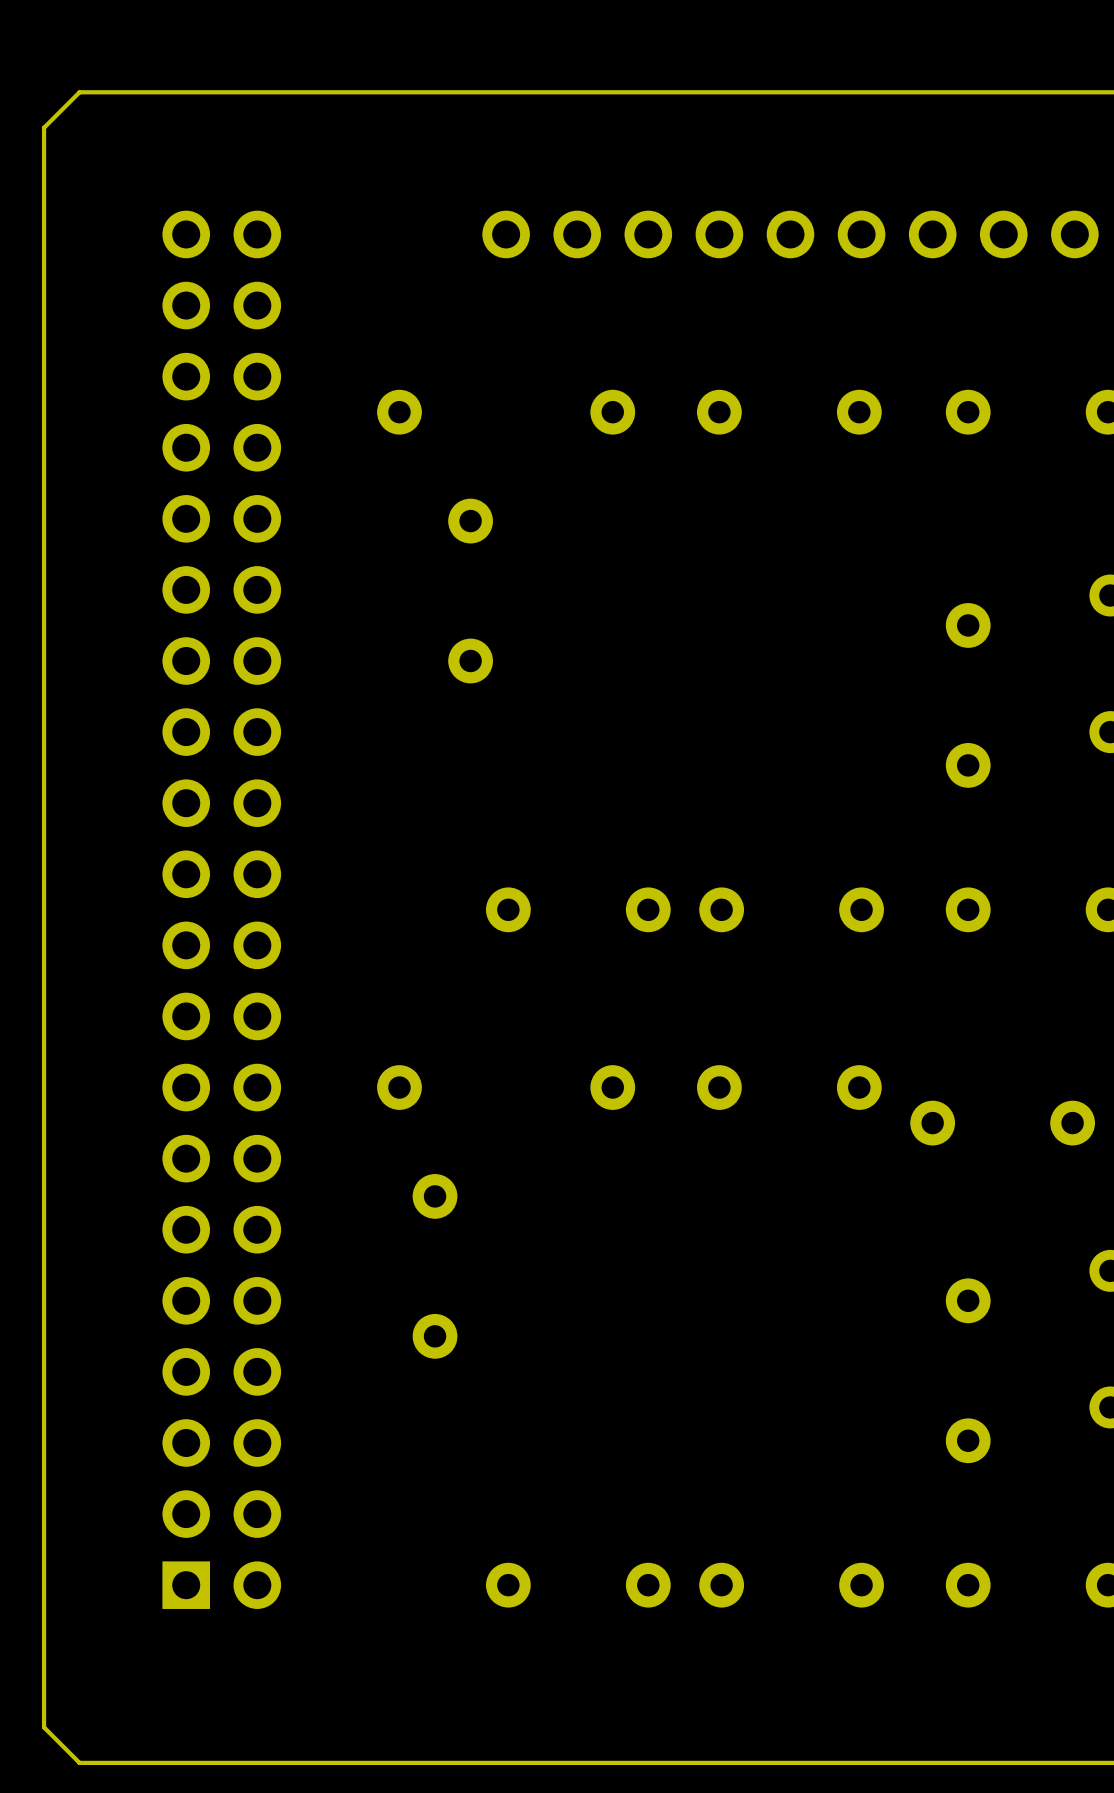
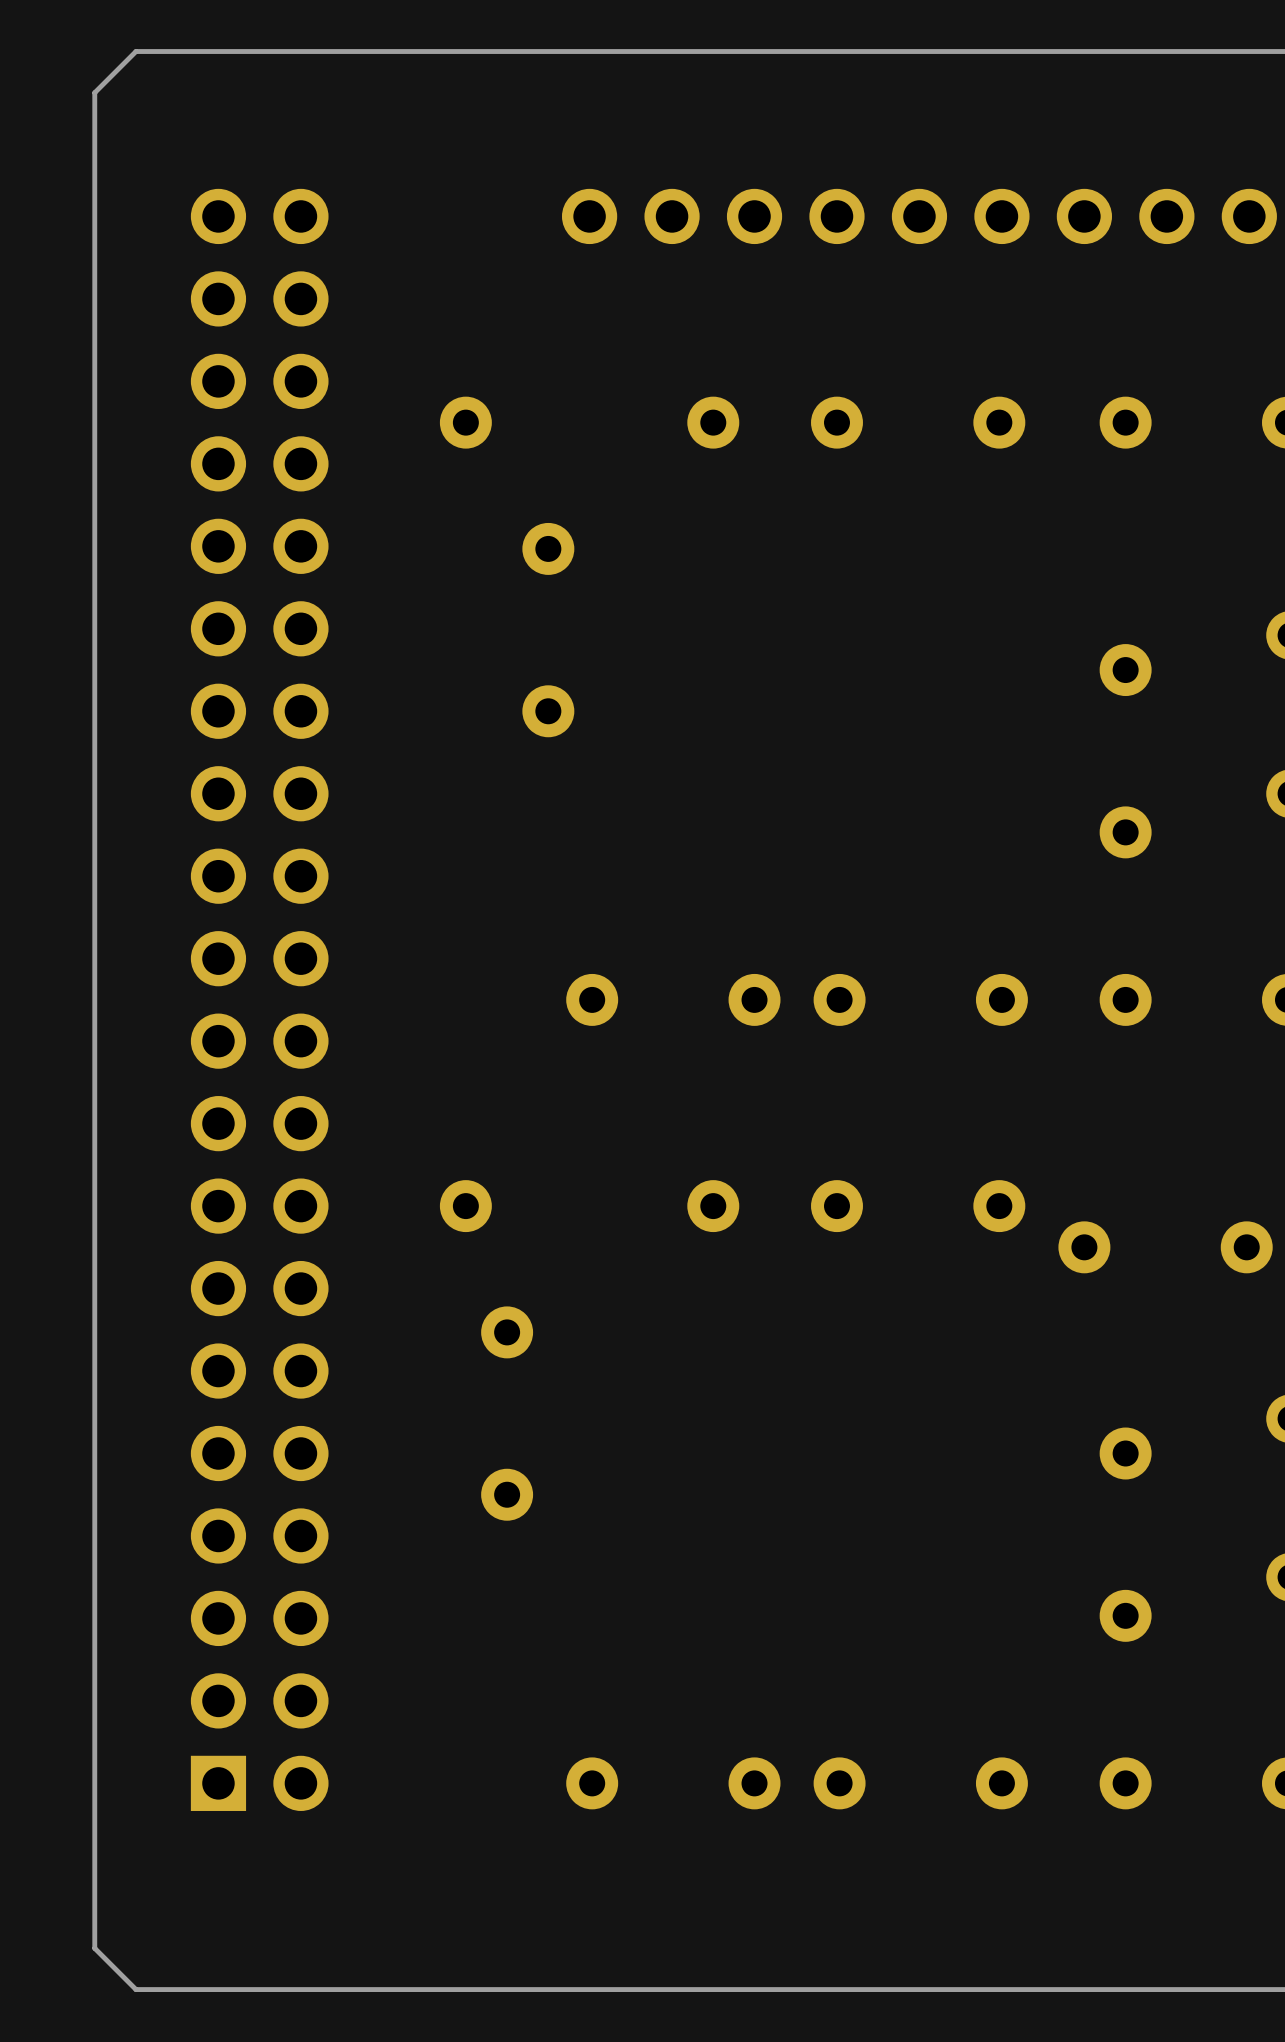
board edge: (115, 92) (79, 92) (44, 127) (44, 1727) (79, 1762) (115, 1762) -> (136, 51) (94, 92) (94, 1948) (136, 1989)

